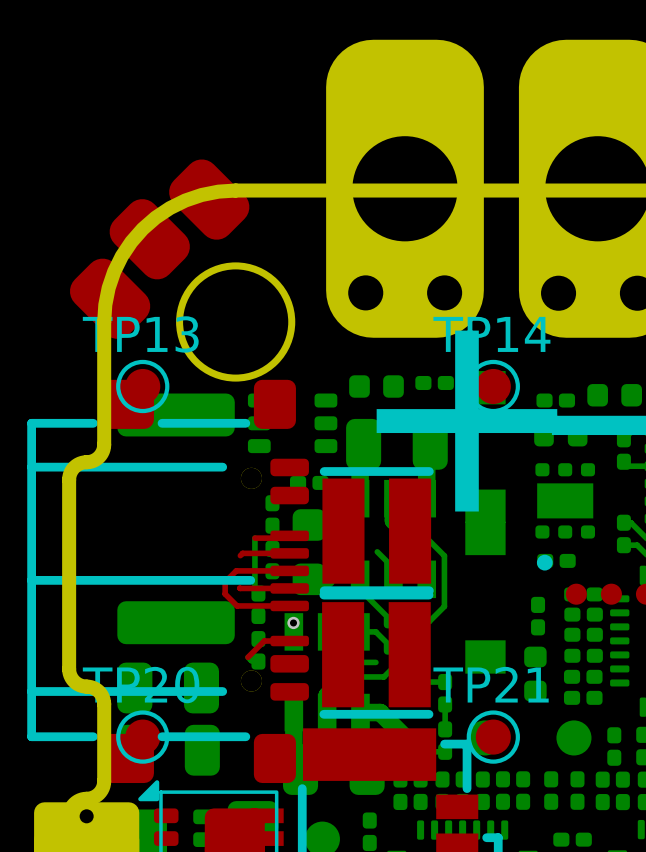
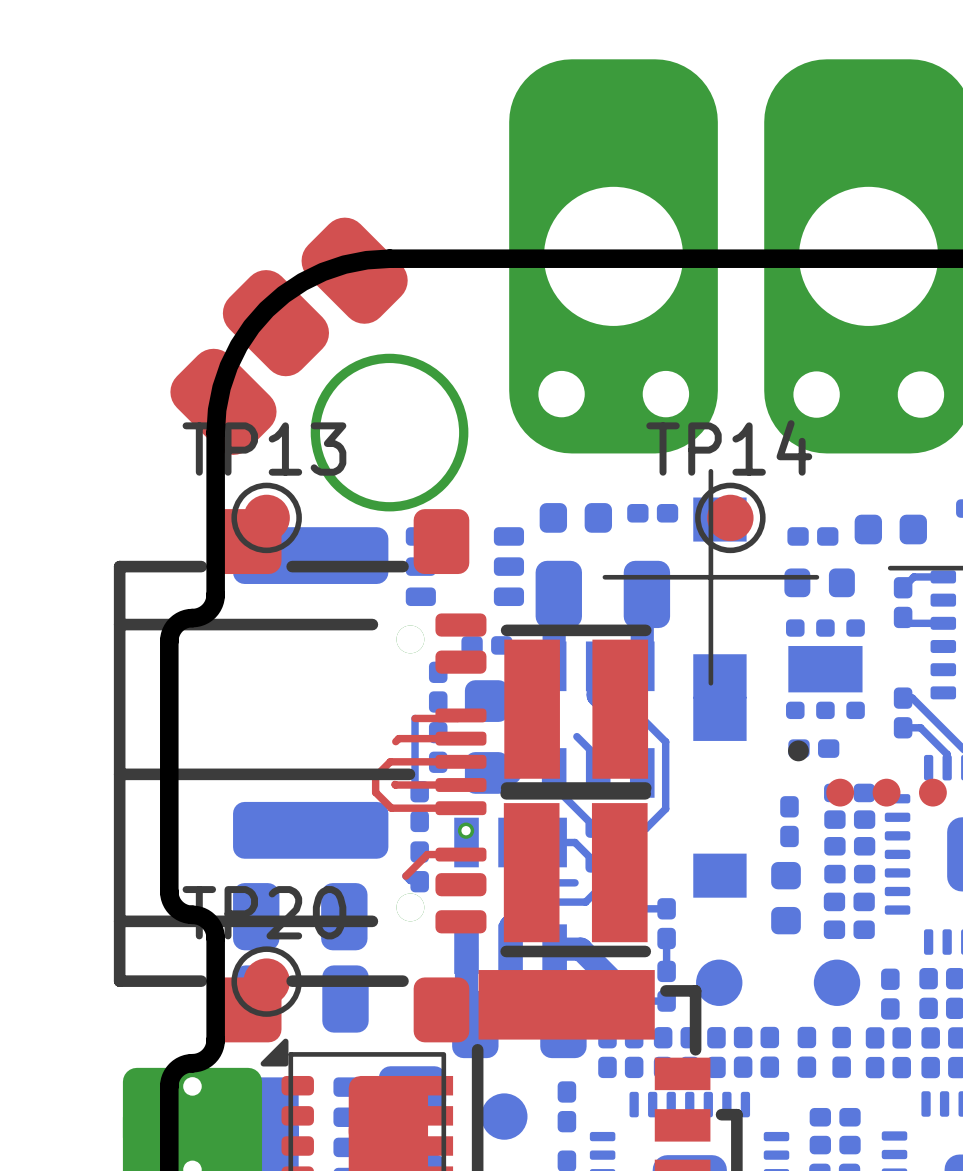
TP21: (493, 737) -> none

